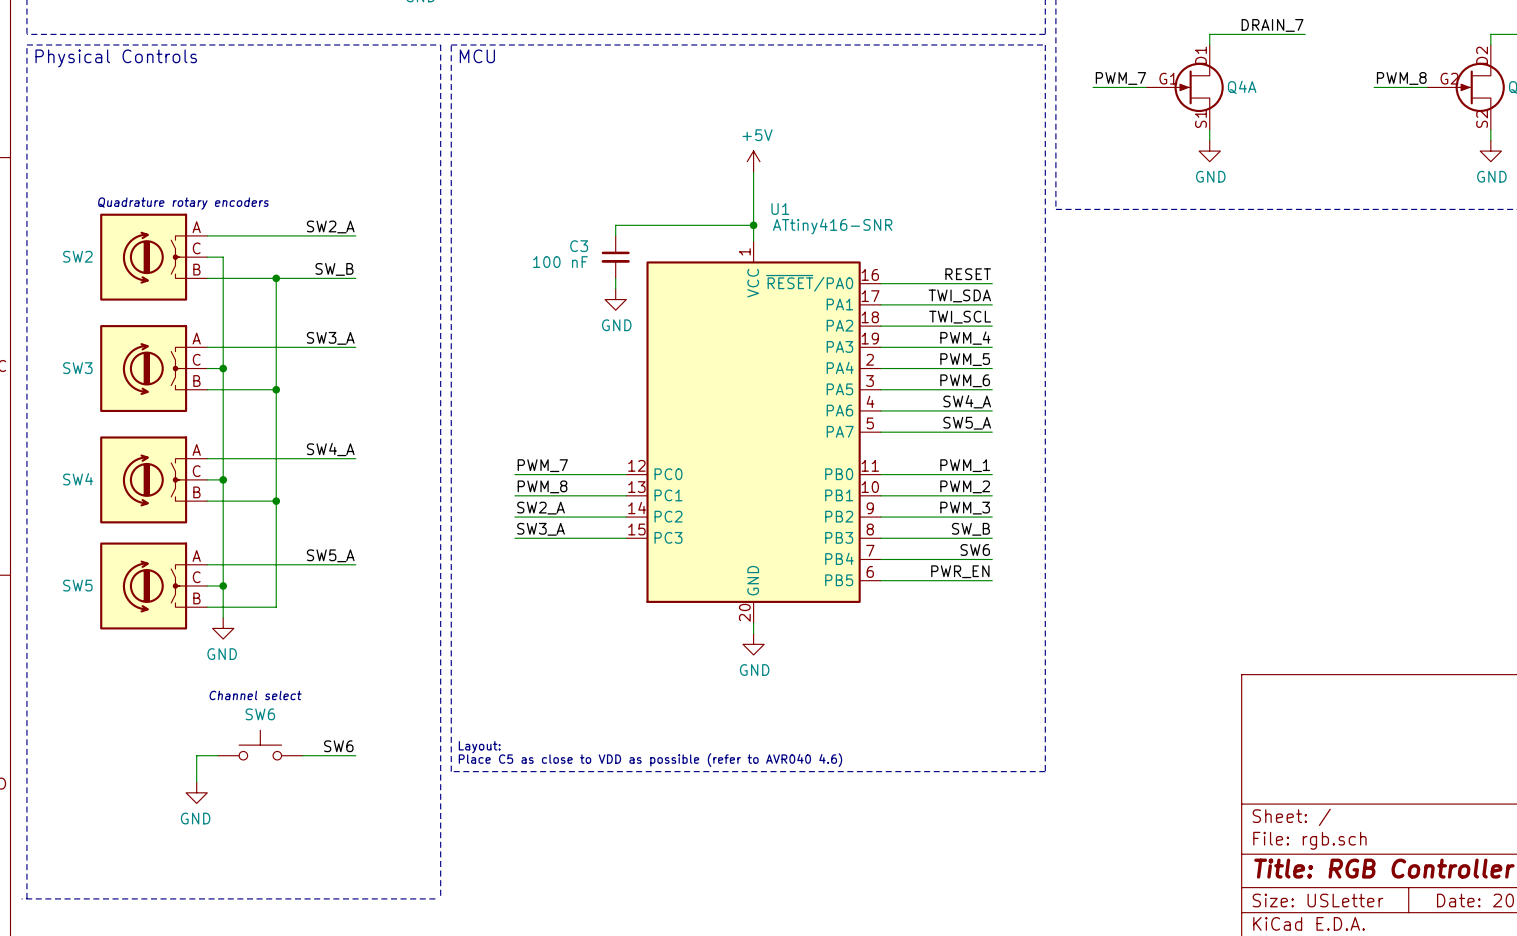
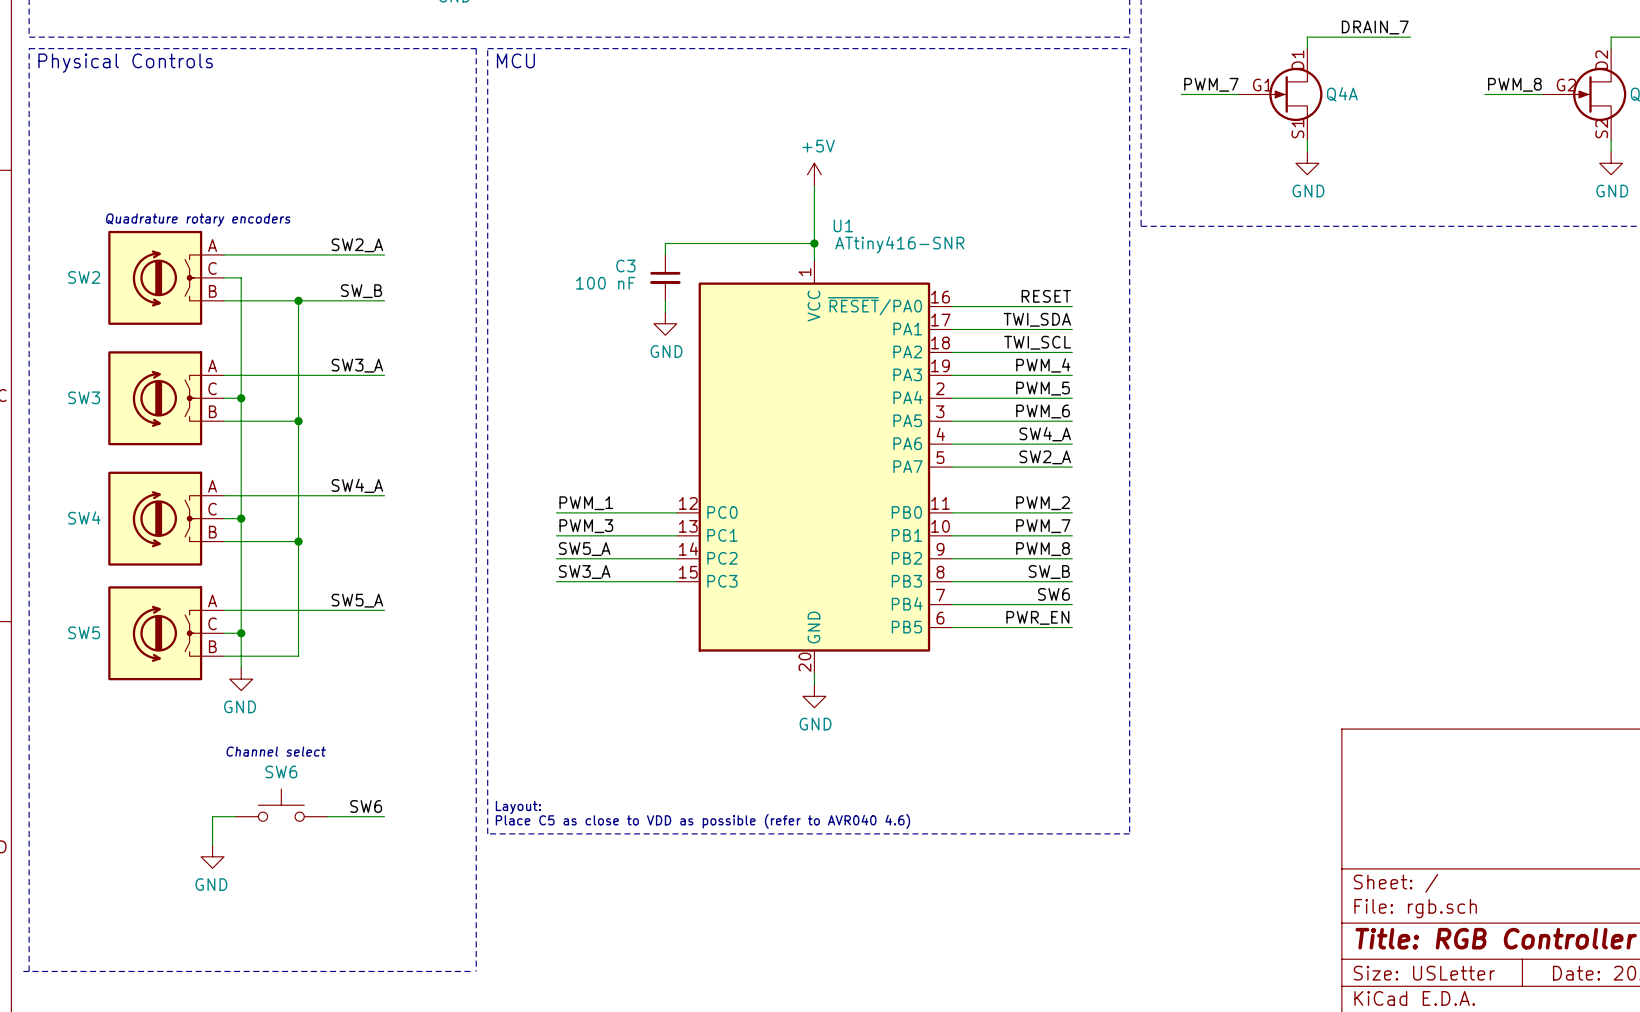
label: SW5_A (967, 423) -> SW2_A (1045, 457)
label: PWM_7 (542, 465) -> PWM_1 (586, 503)
label: PWM_1 (965, 465) -> PWM_2 (1043, 503)
label: PWM_8 (542, 486) -> PWM_3 (586, 526)
label: PWM_2 (965, 486) -> PWM_7 (1043, 526)
label: SW2_A (541, 508) -> SW5_A (584, 549)
label: PWM_3 (965, 508) -> PWM_8 (1043, 549)

